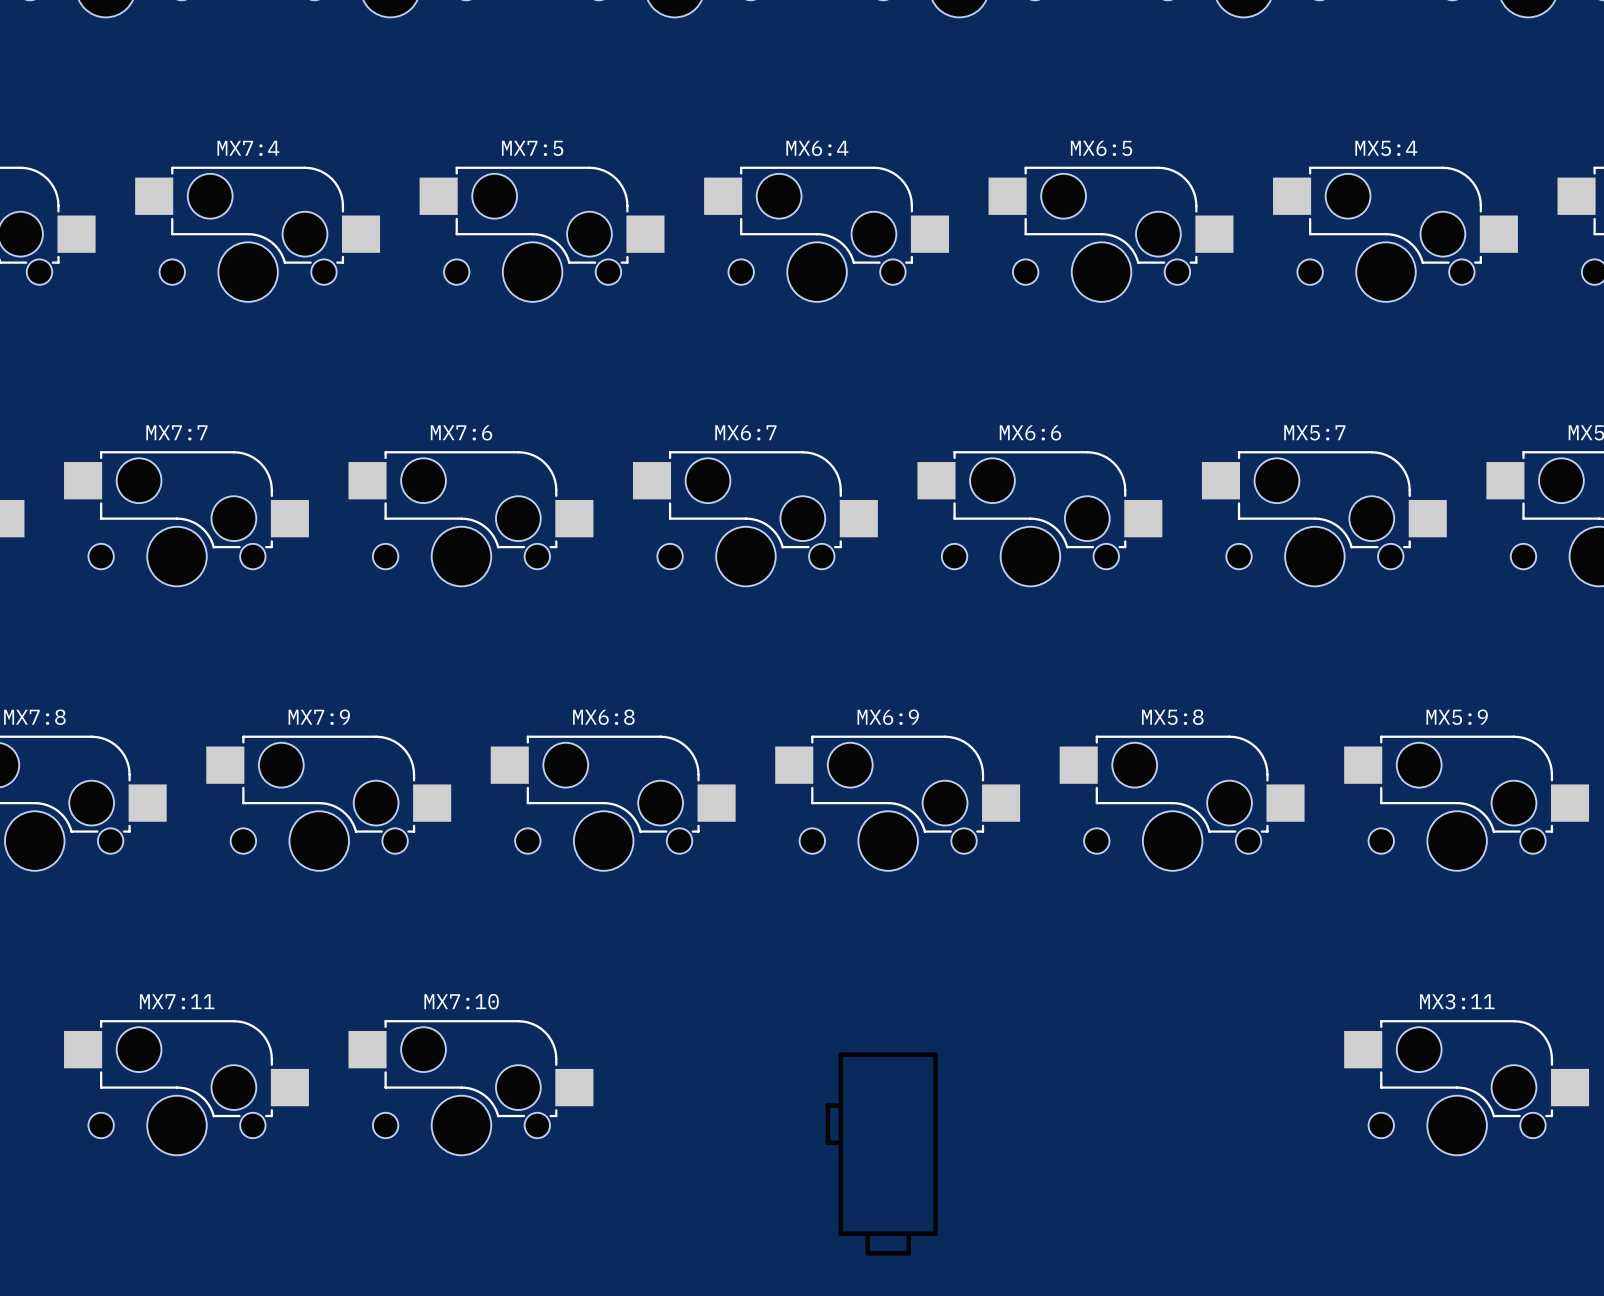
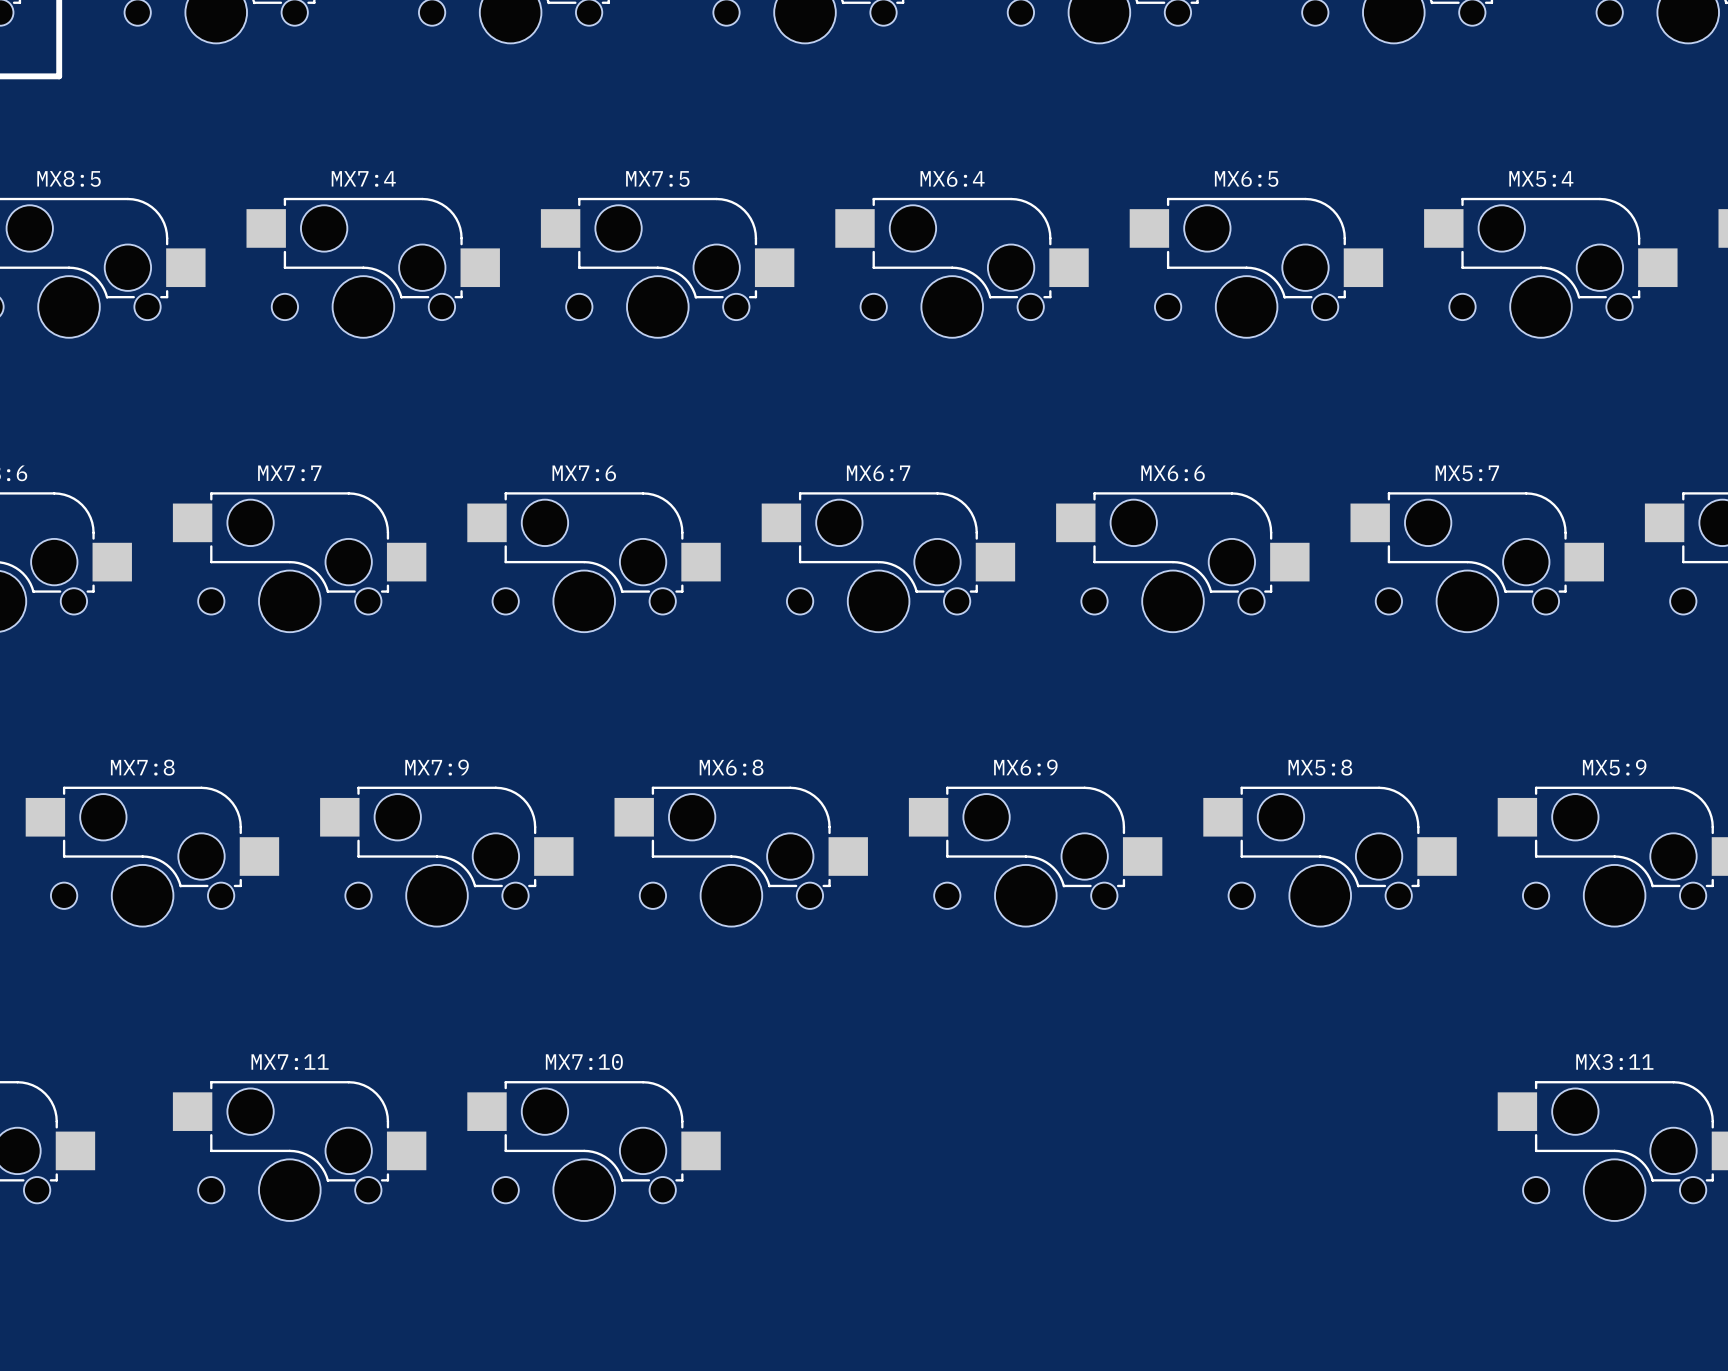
part: (881, 1154) -> none

